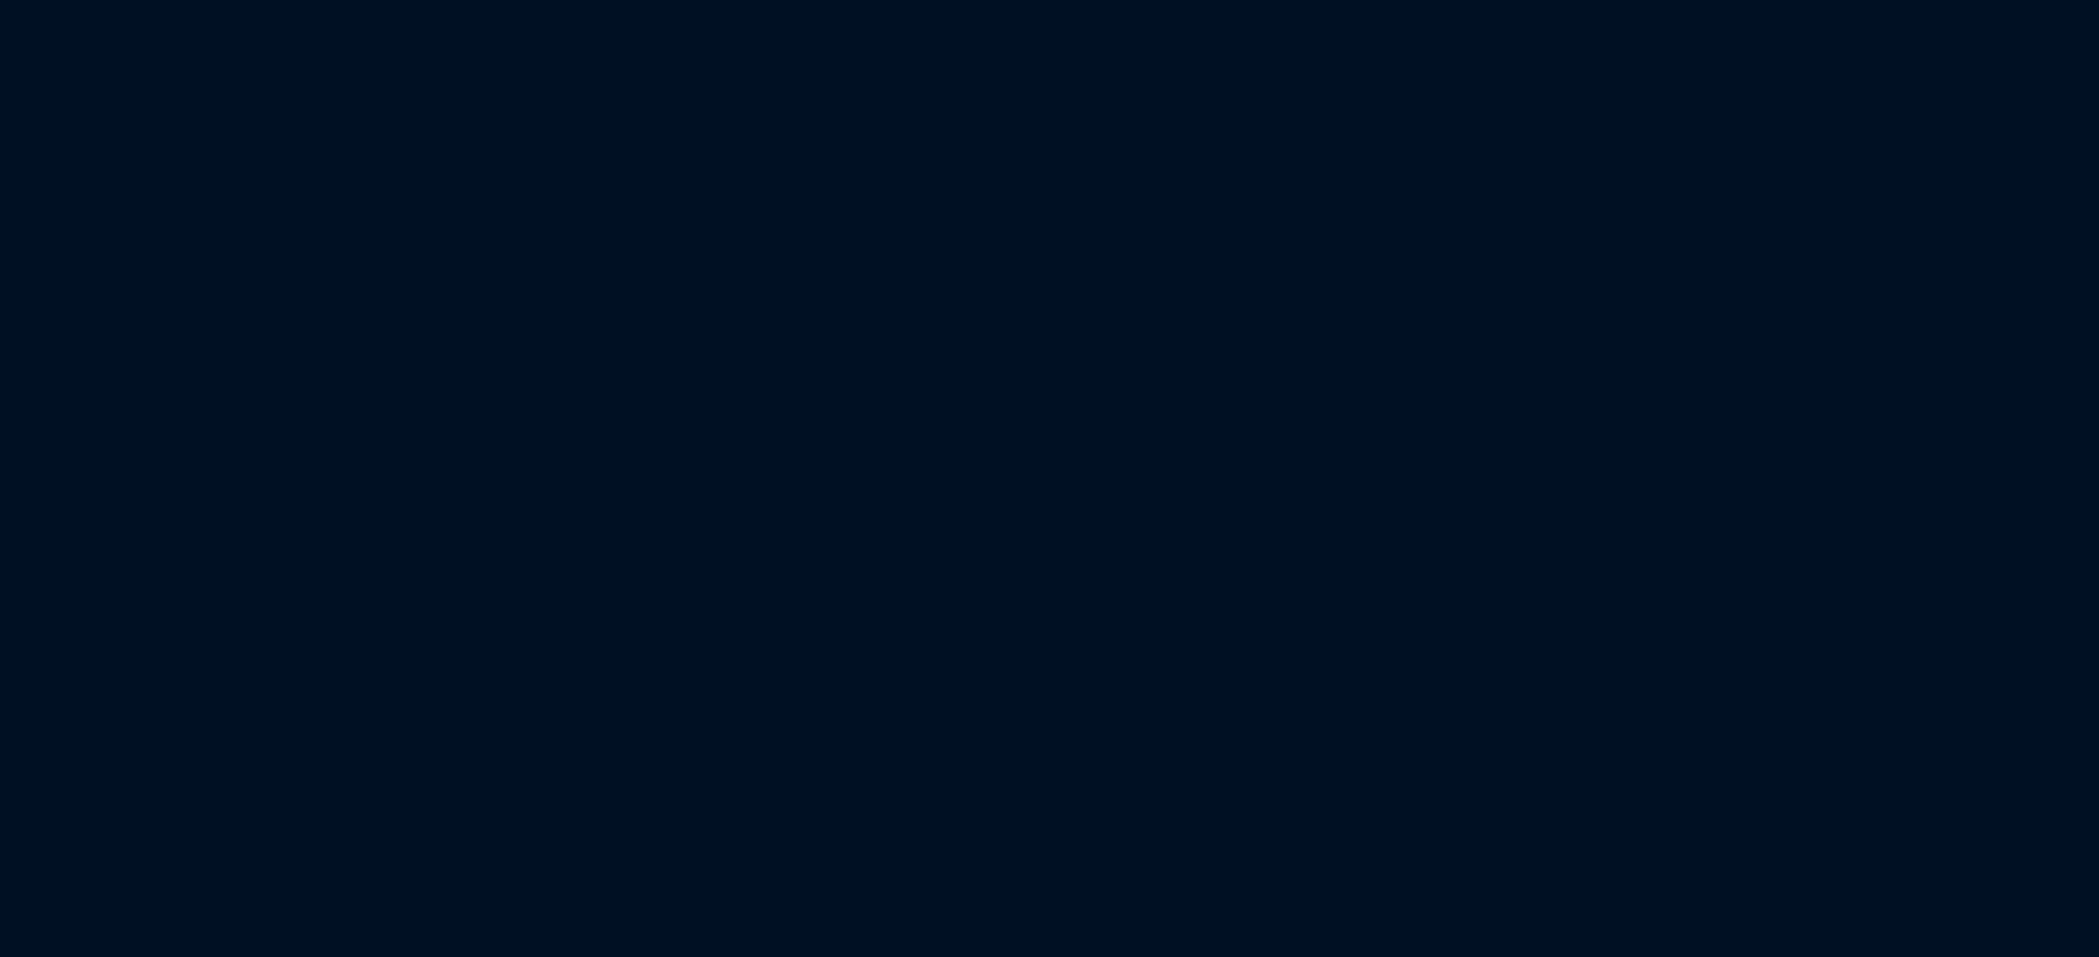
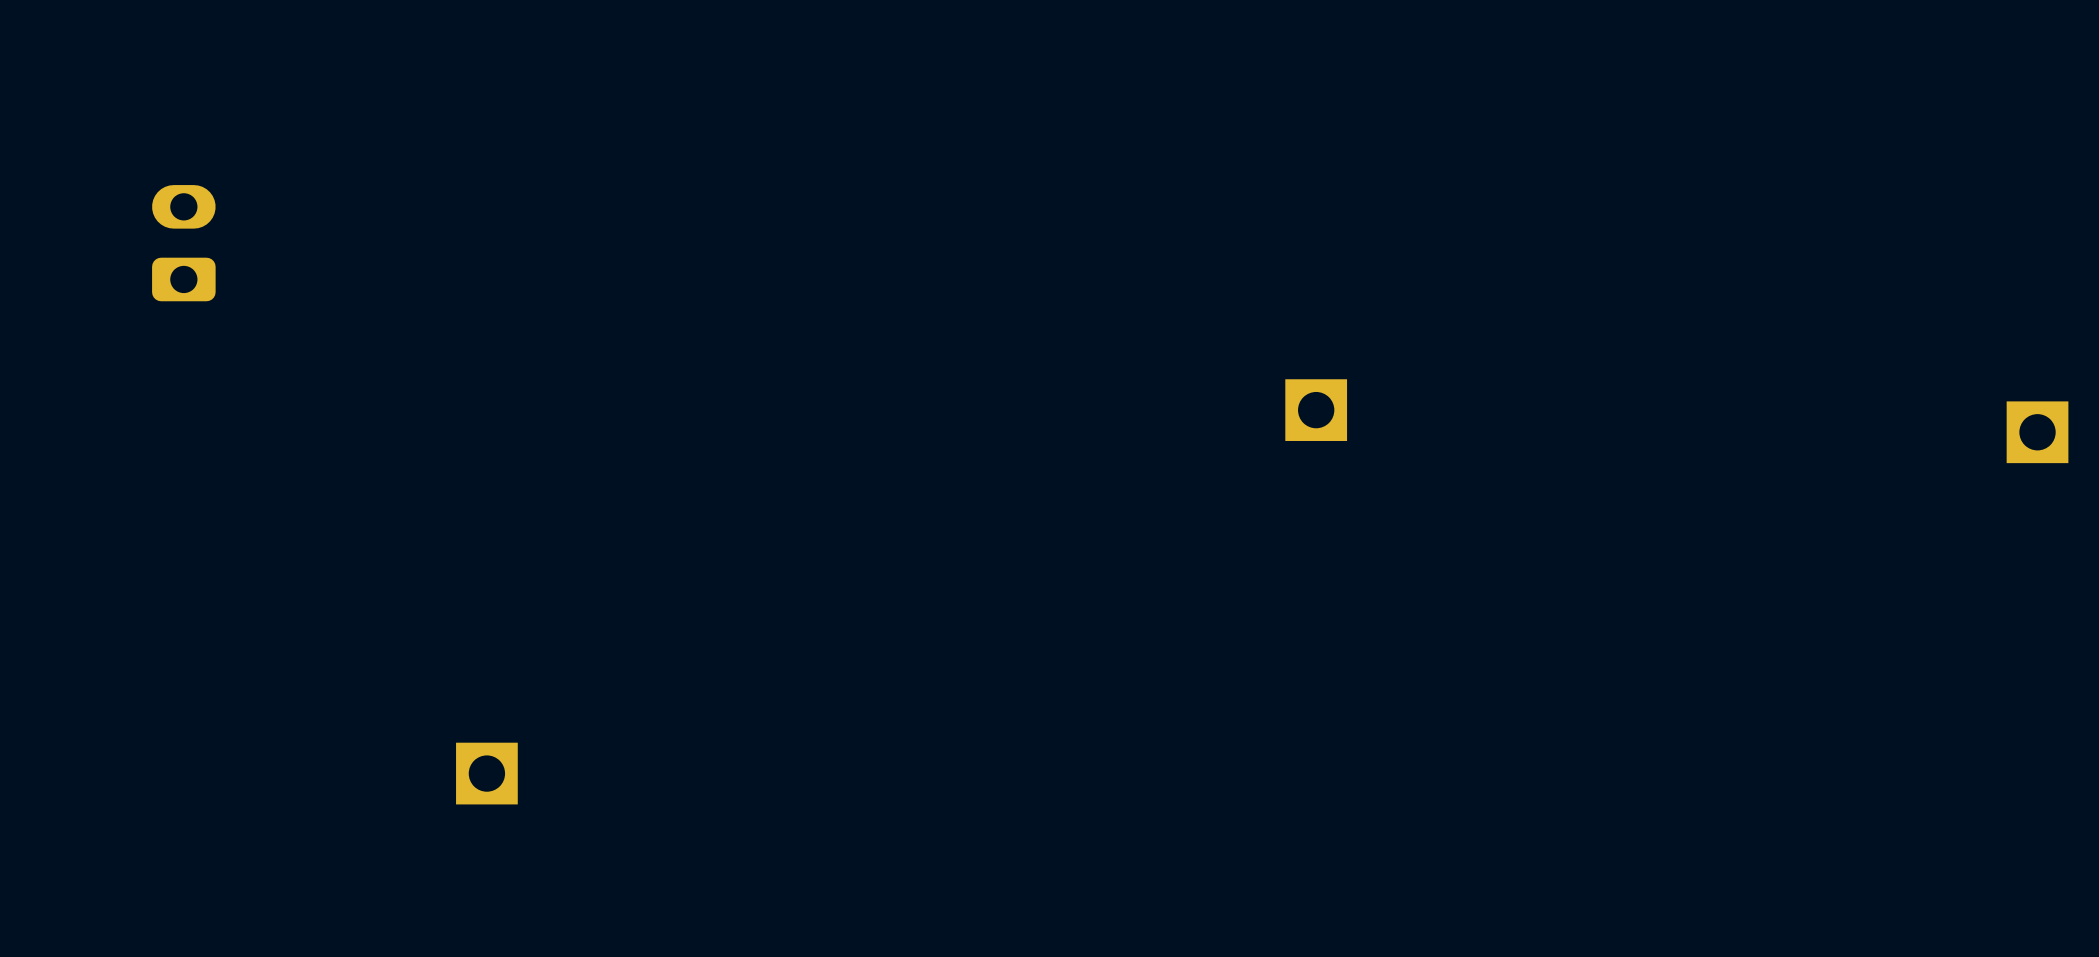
part: none -> (183, 243)
part: none -> (1316, 410)
part: none -> (2037, 432)
part: none -> (486, 773)

